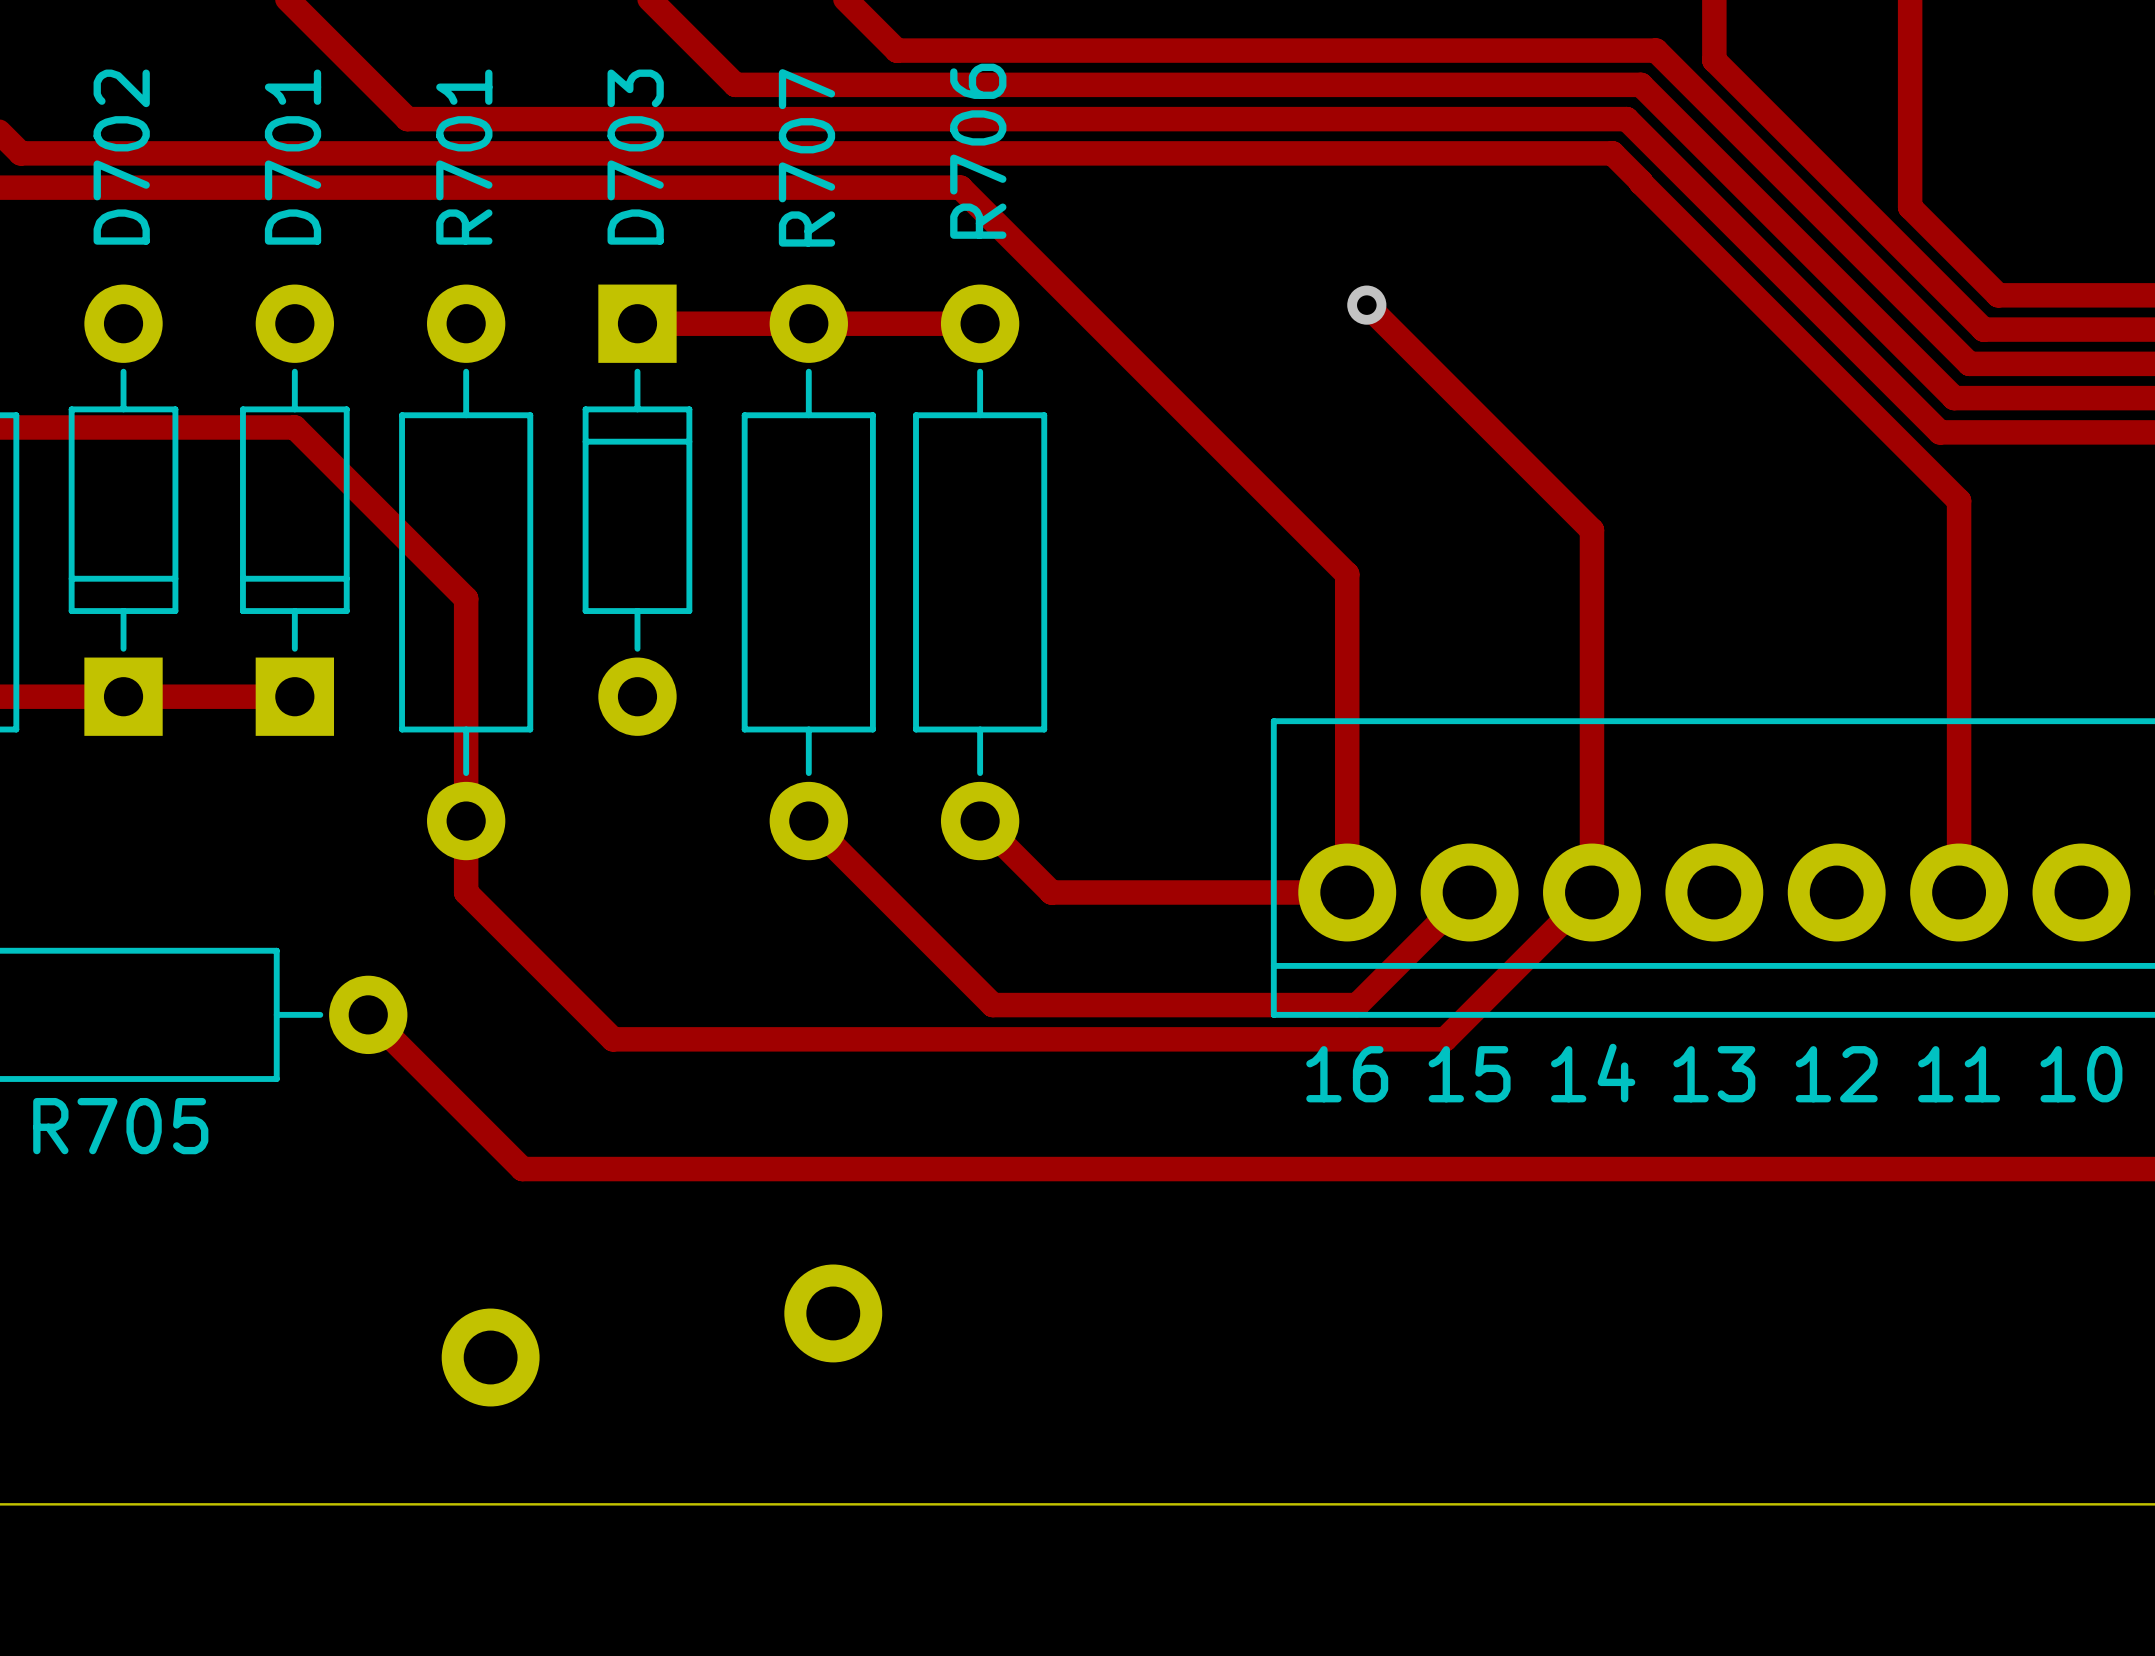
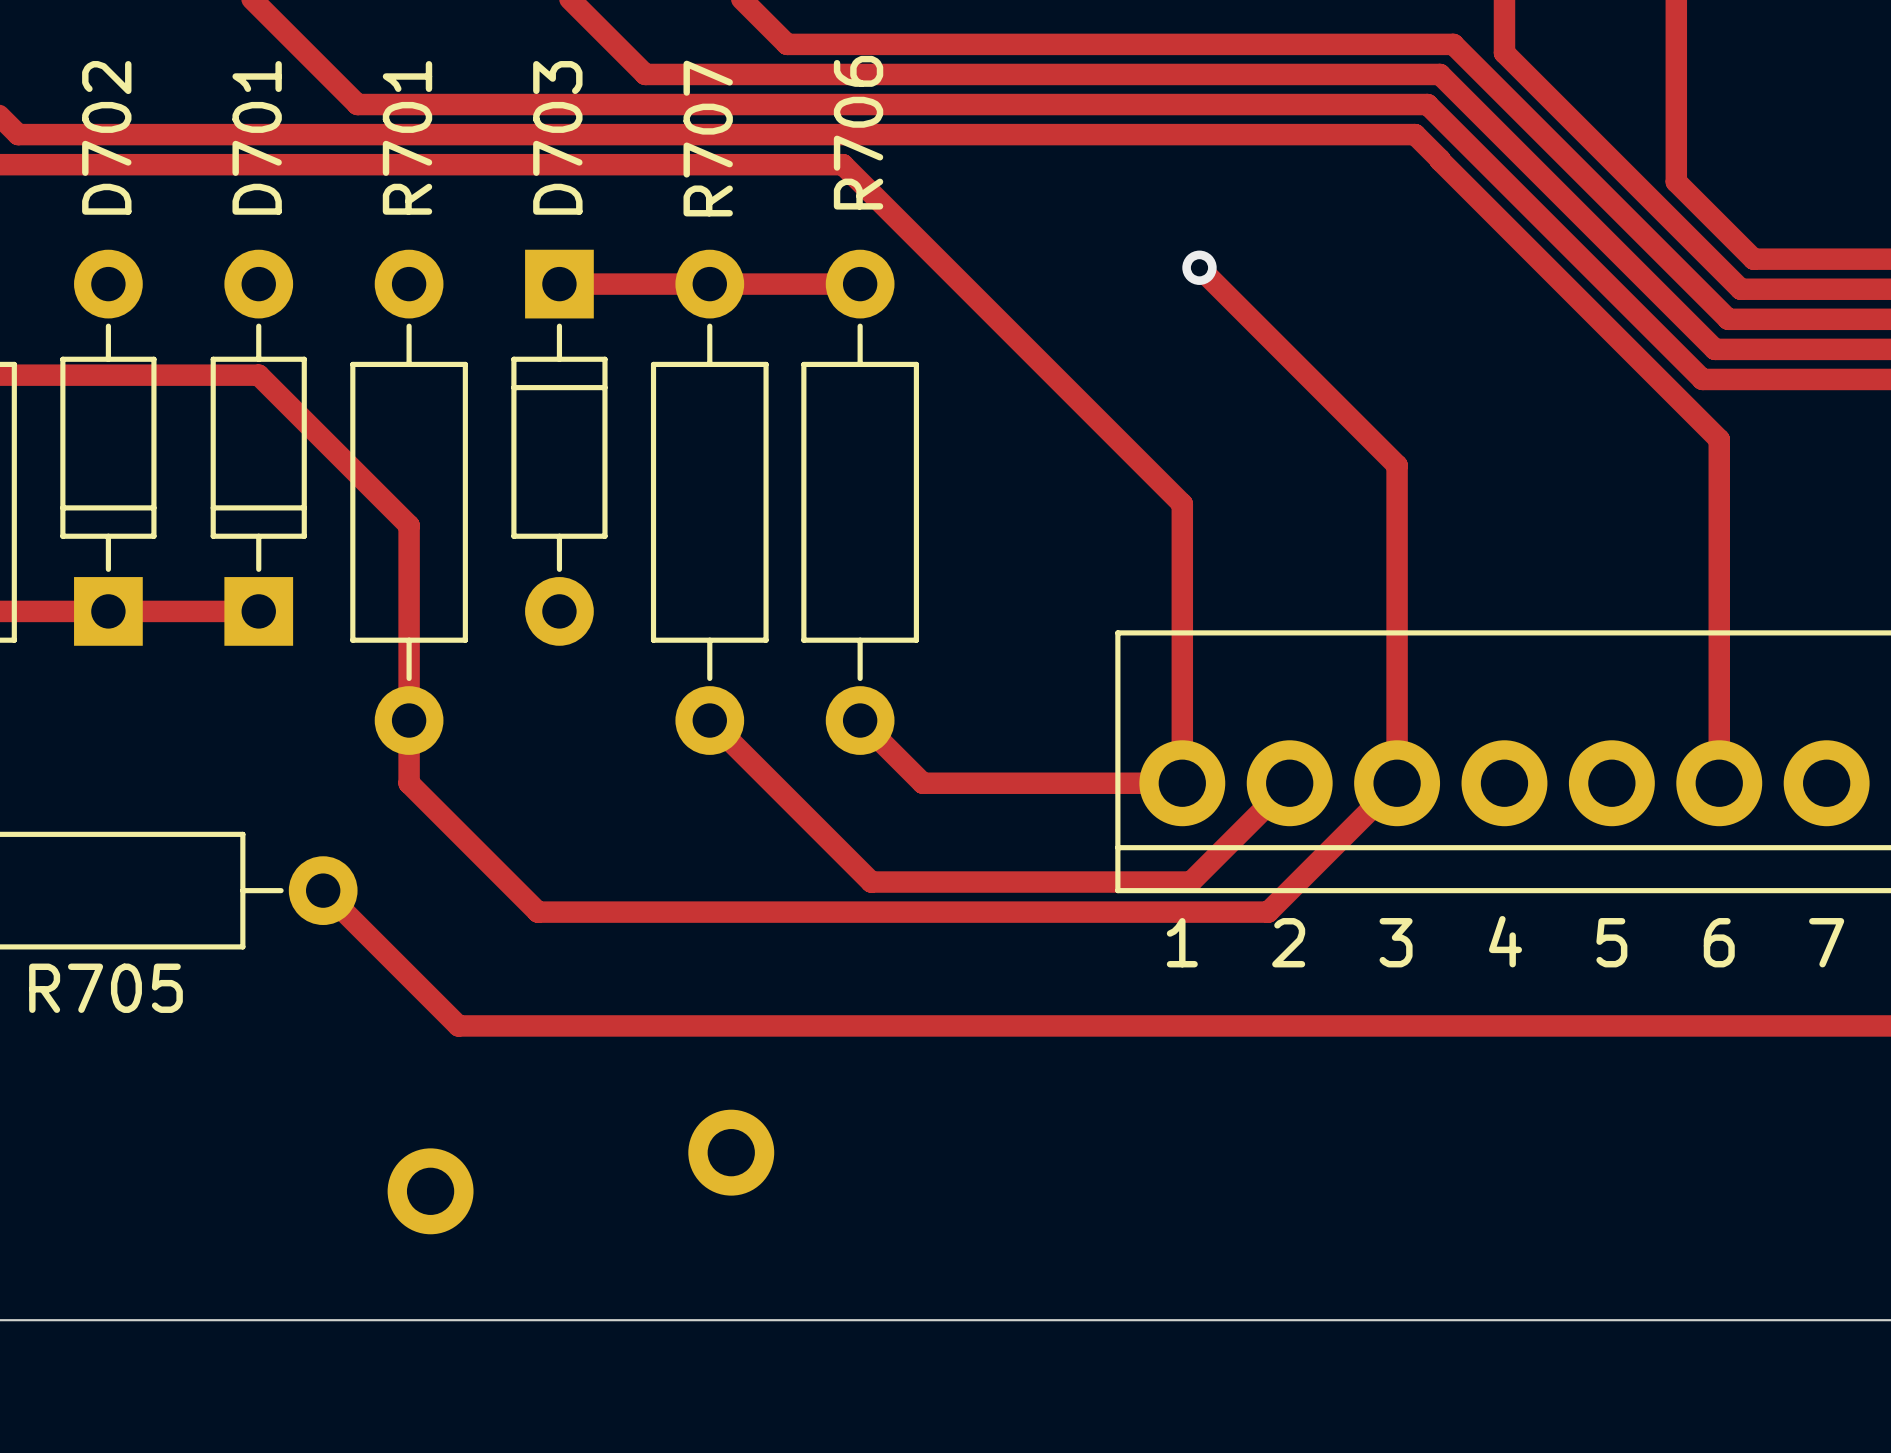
text: 14 (1593, 1073) -> 3 (1396, 942)
text: 16 (1347, 1074) -> 1 (1182, 942)
text: 15 (1469, 1074) -> 2 (1288, 942)
text: 13 (1714, 1074) -> 4 (1505, 941)
text: 12 (1836, 1074) -> 5 (1611, 942)
text: 11 (1959, 1074) -> 6 (1719, 942)
text: 10 (2081, 1074) -> 7 (1826, 942)

